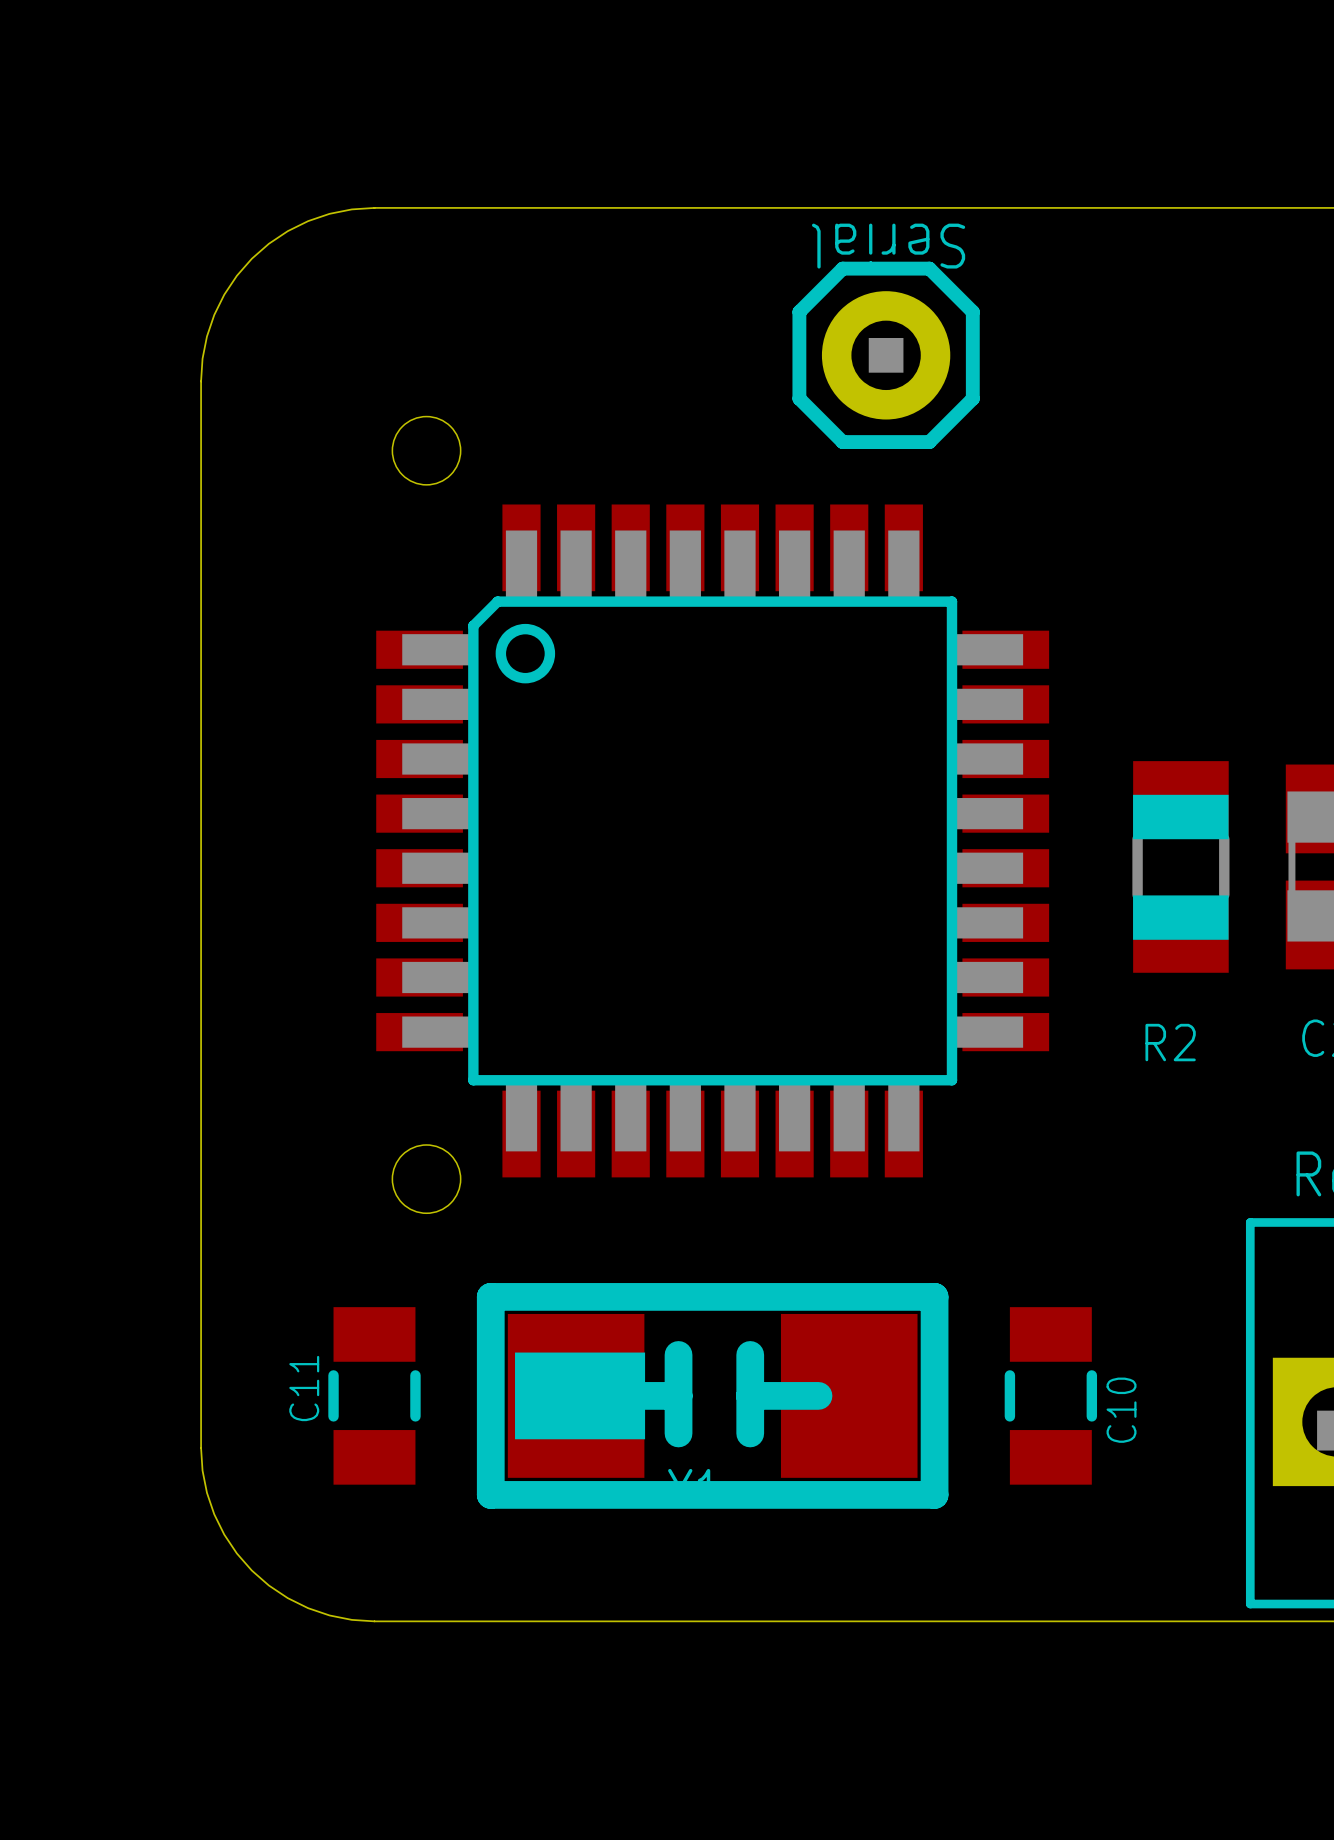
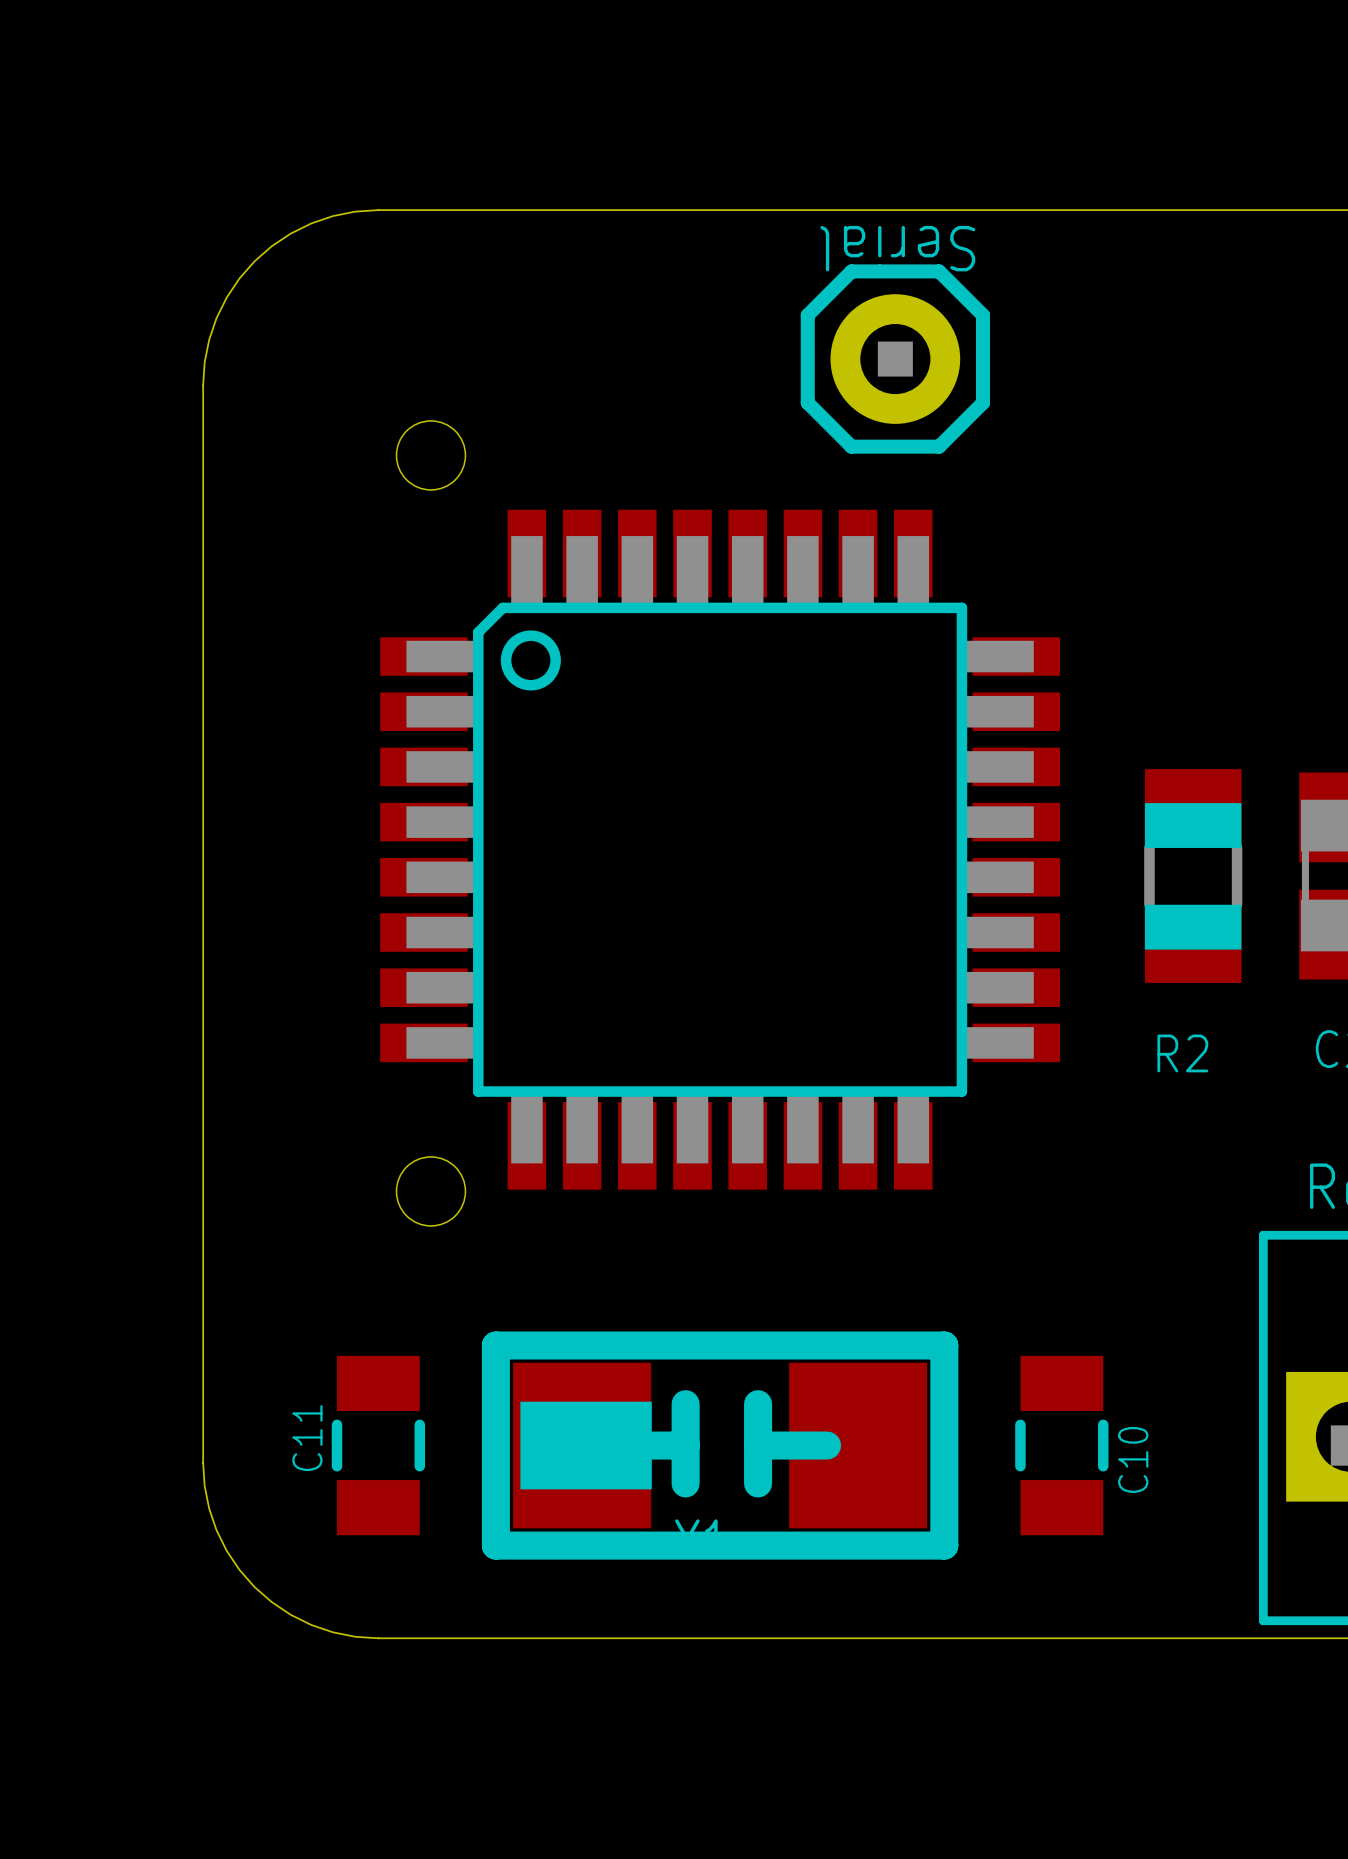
C11 position: (374, 1395) -> (378, 1445)
part position: (712, 1395) -> (720, 1445)
C10 position: (1050, 1395) -> (1061, 1445)

